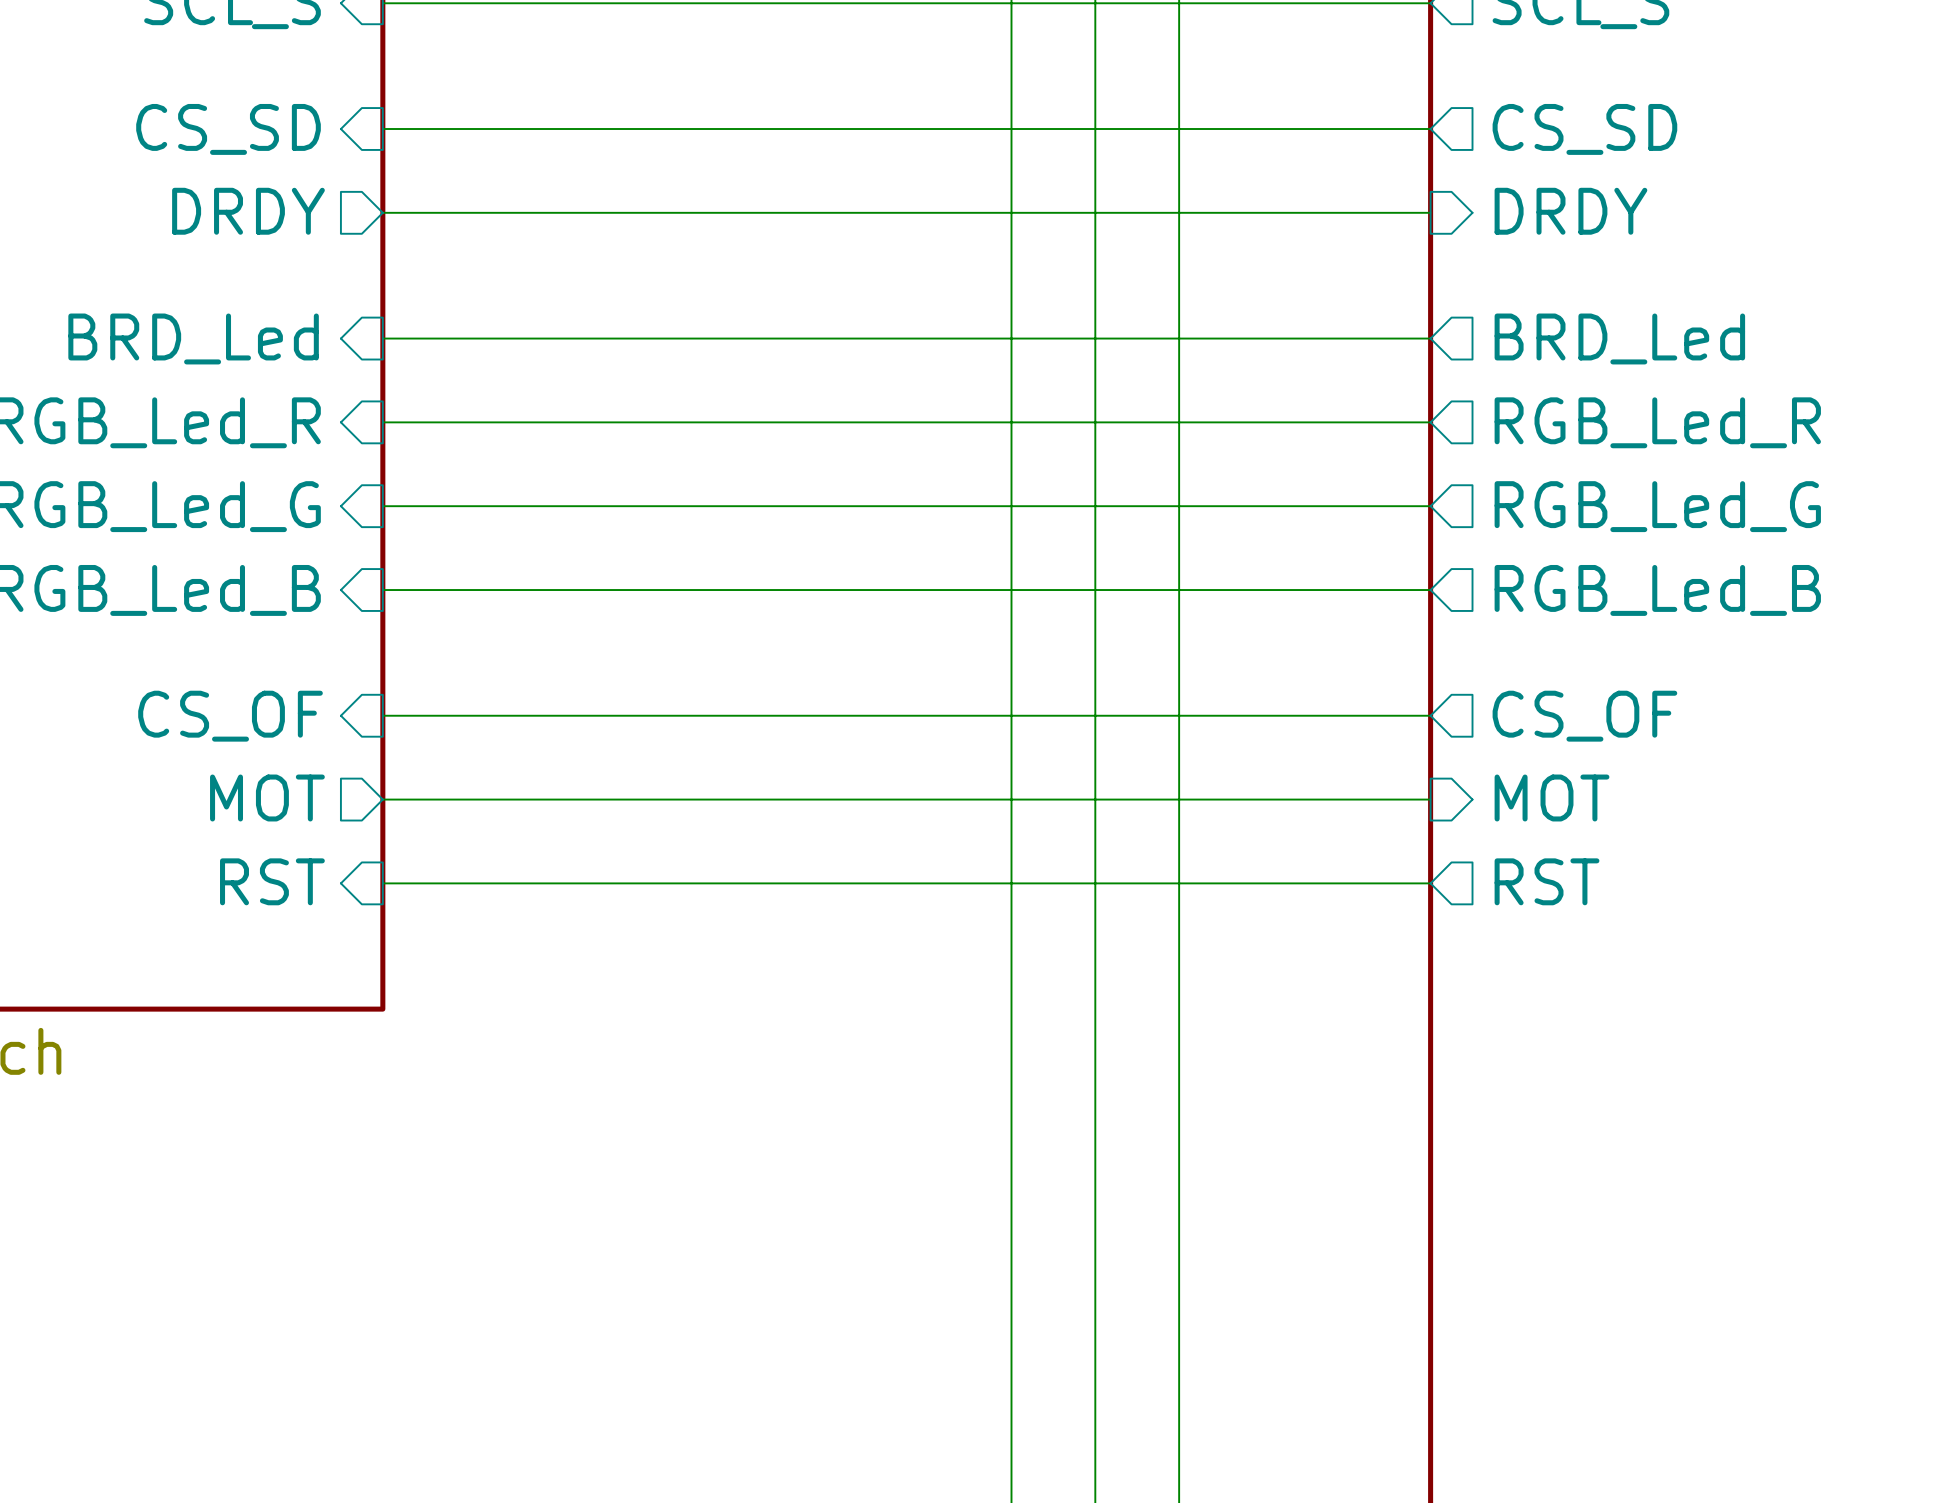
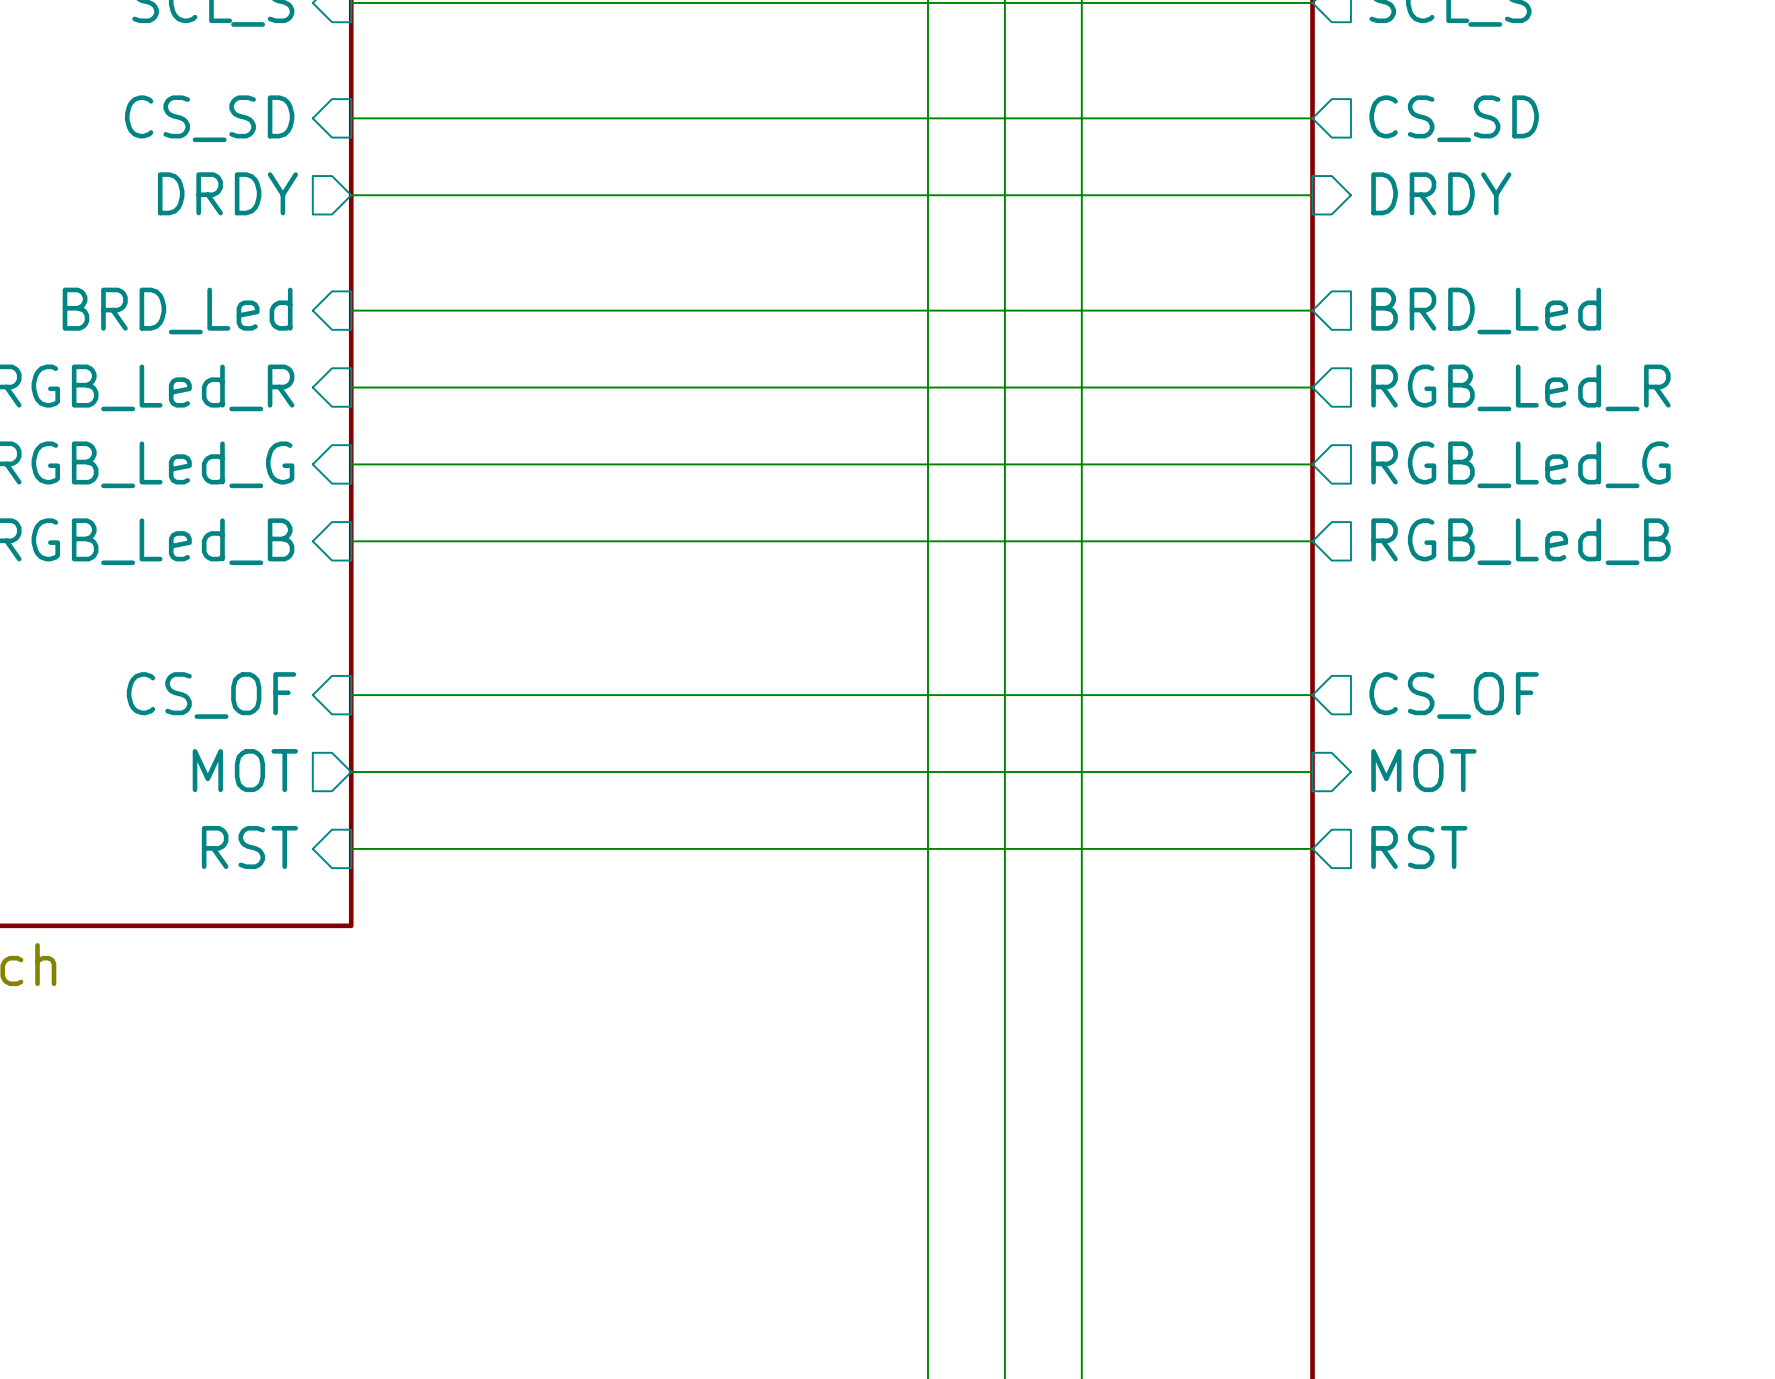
wire: (382, 715) (1430, 715) -> (351, 695) (1312, 695)
sheet pin position: CS_OF (230, 716) -> CS_OF (211, 695)
sheet pin position: CS_OF (1584, 716) -> CS_OF (1454, 695)
sheet pin position: MOT (267, 798) -> MOT (245, 770)
sheet pin position: MOT (1551, 798) -> MOT (1423, 770)
wire: (382, 799) (1430, 799) -> (351, 772) (1312, 772)
sheet pin position: RST (272, 881) -> RST (249, 847)
sheet pin position: RST (1547, 881) -> RST (1419, 847)
wire: (382, 883) (1430, 883) -> (351, 848) (1312, 848)

